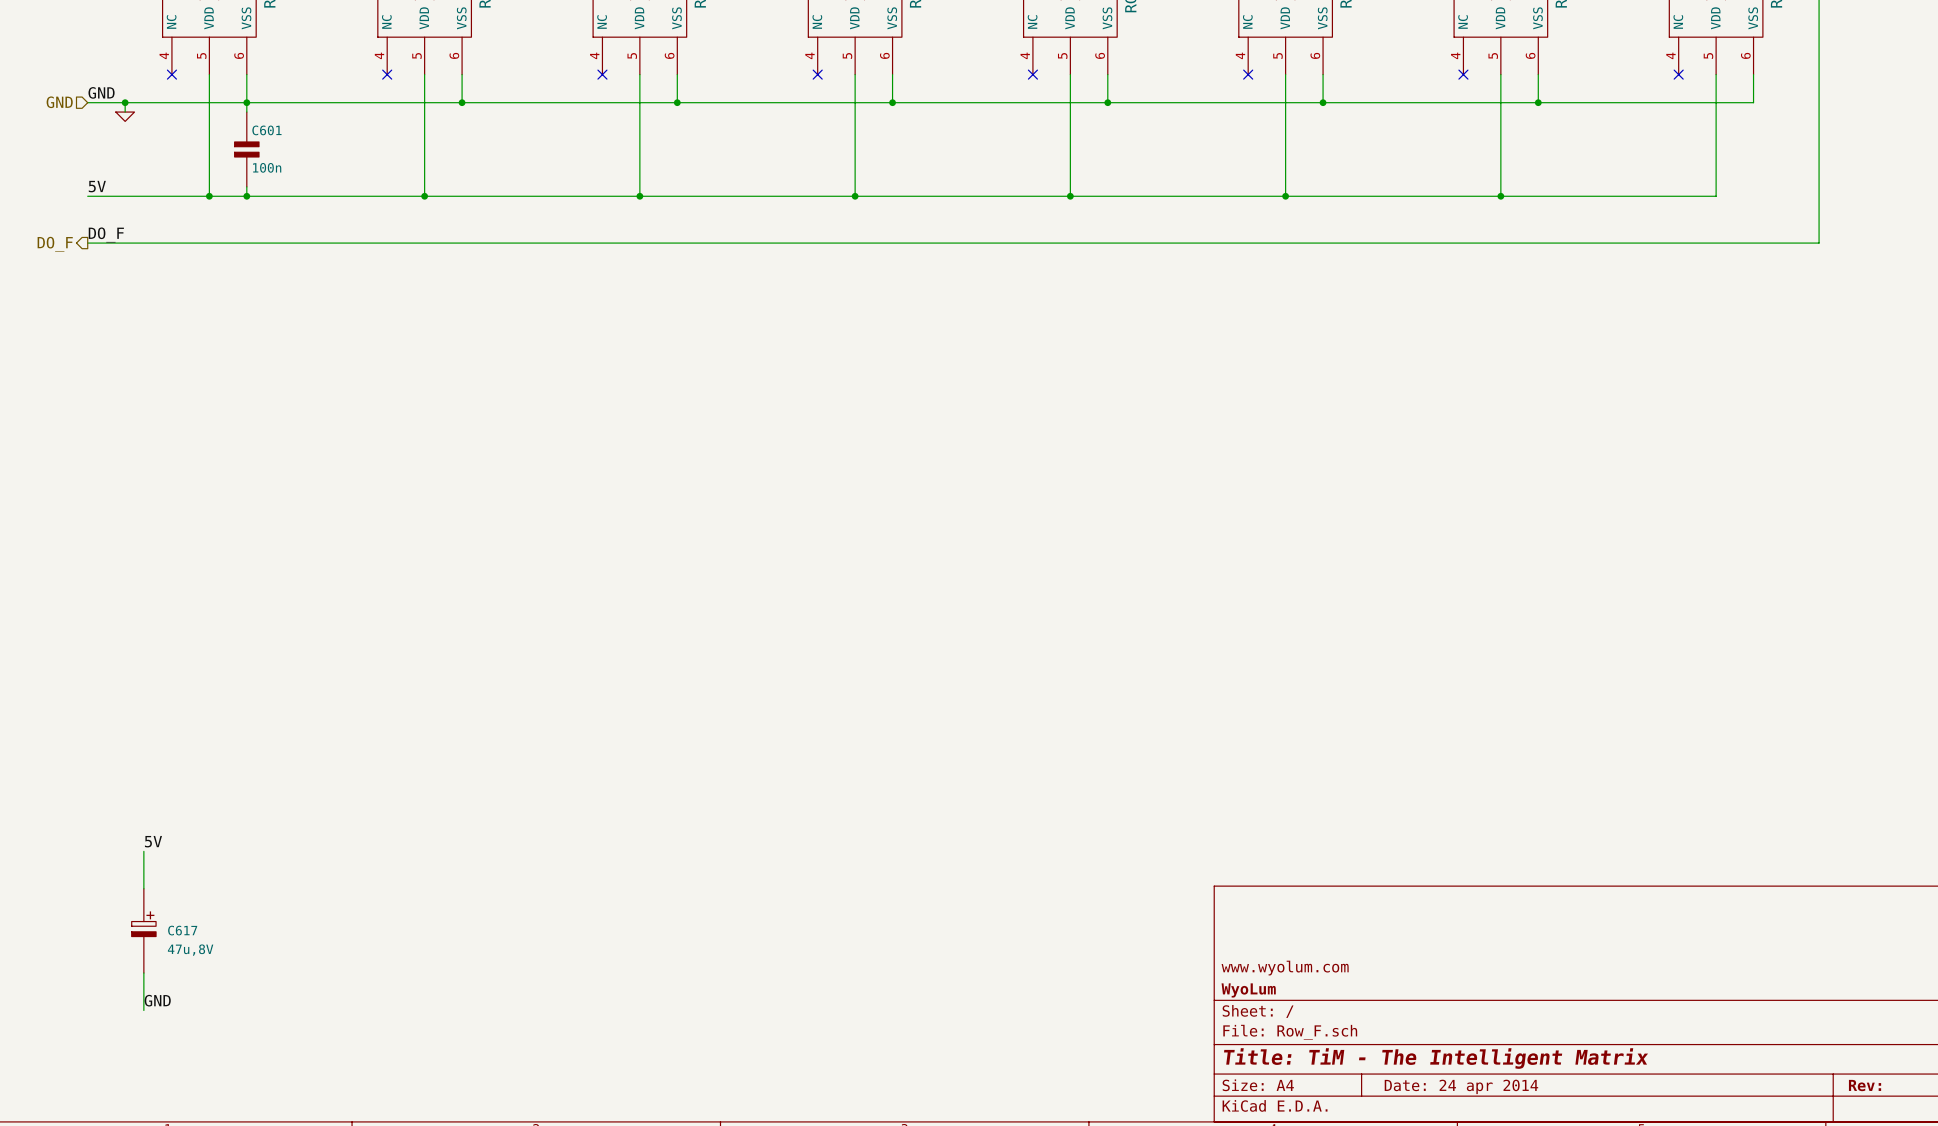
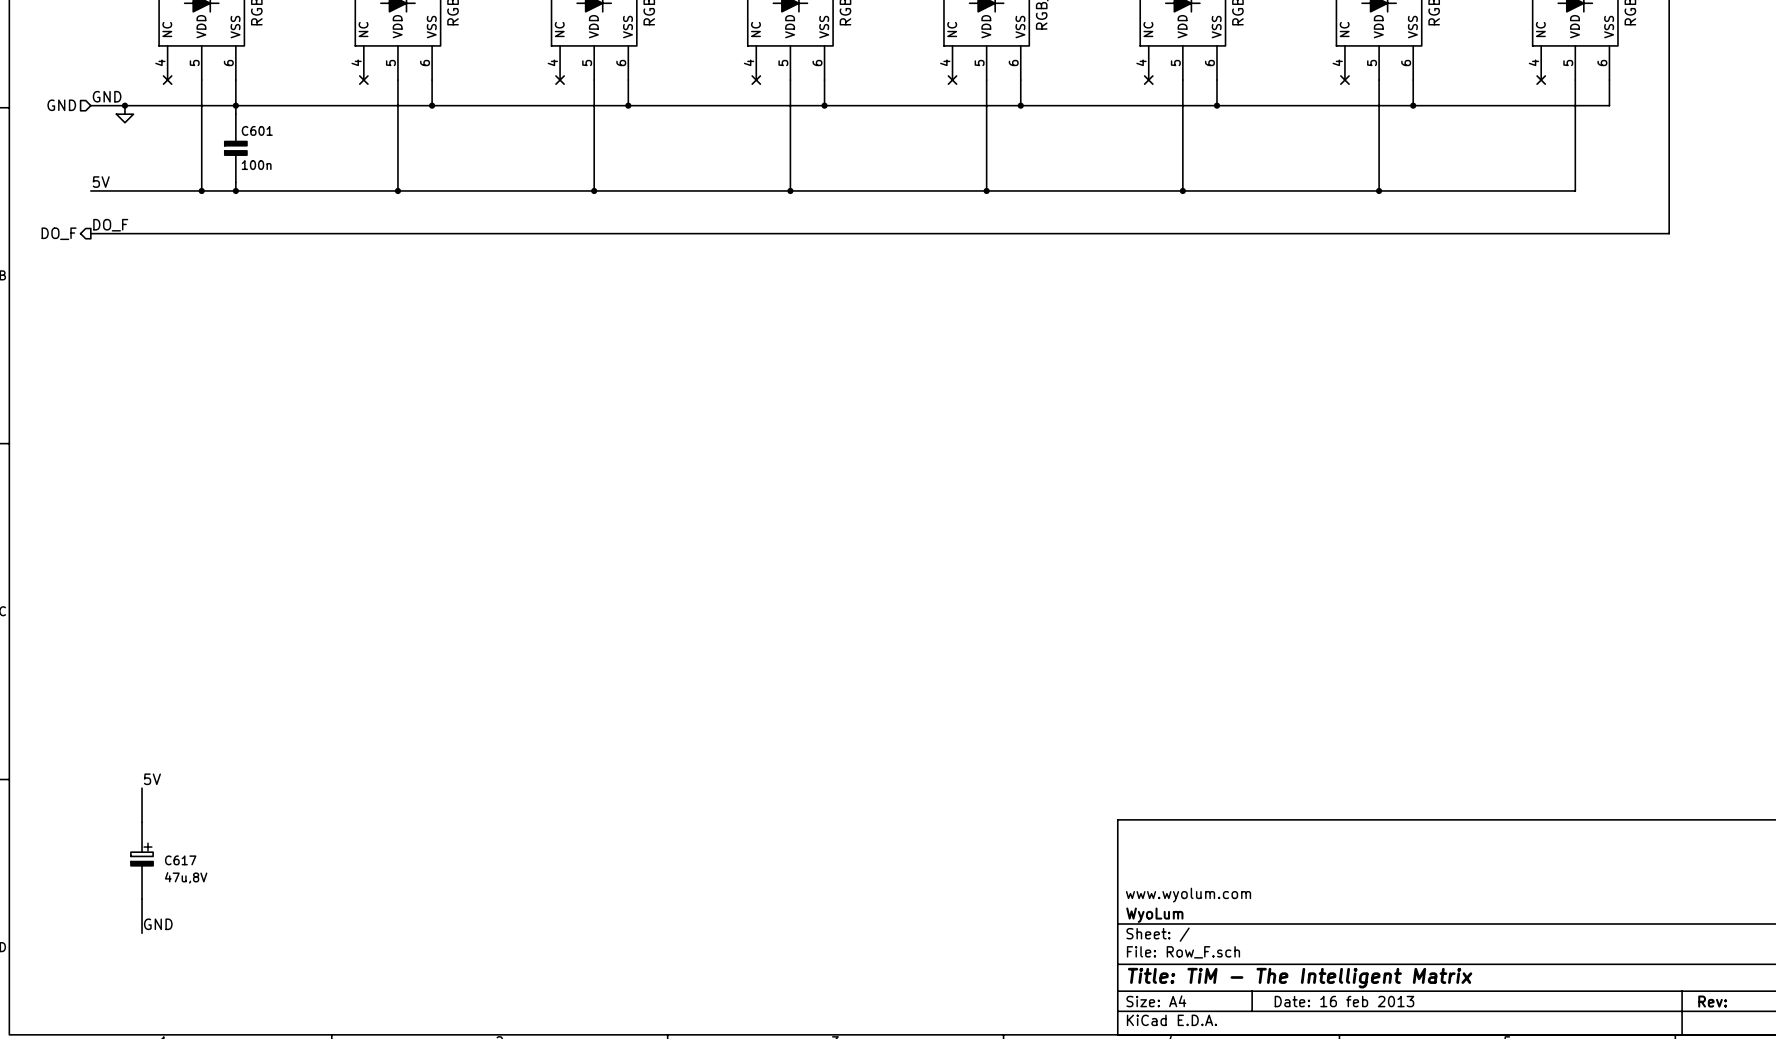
title block: Date: 24 apr 2014 (1461, 1086) -> Date: 16 feb 2013 (1344, 1001)

